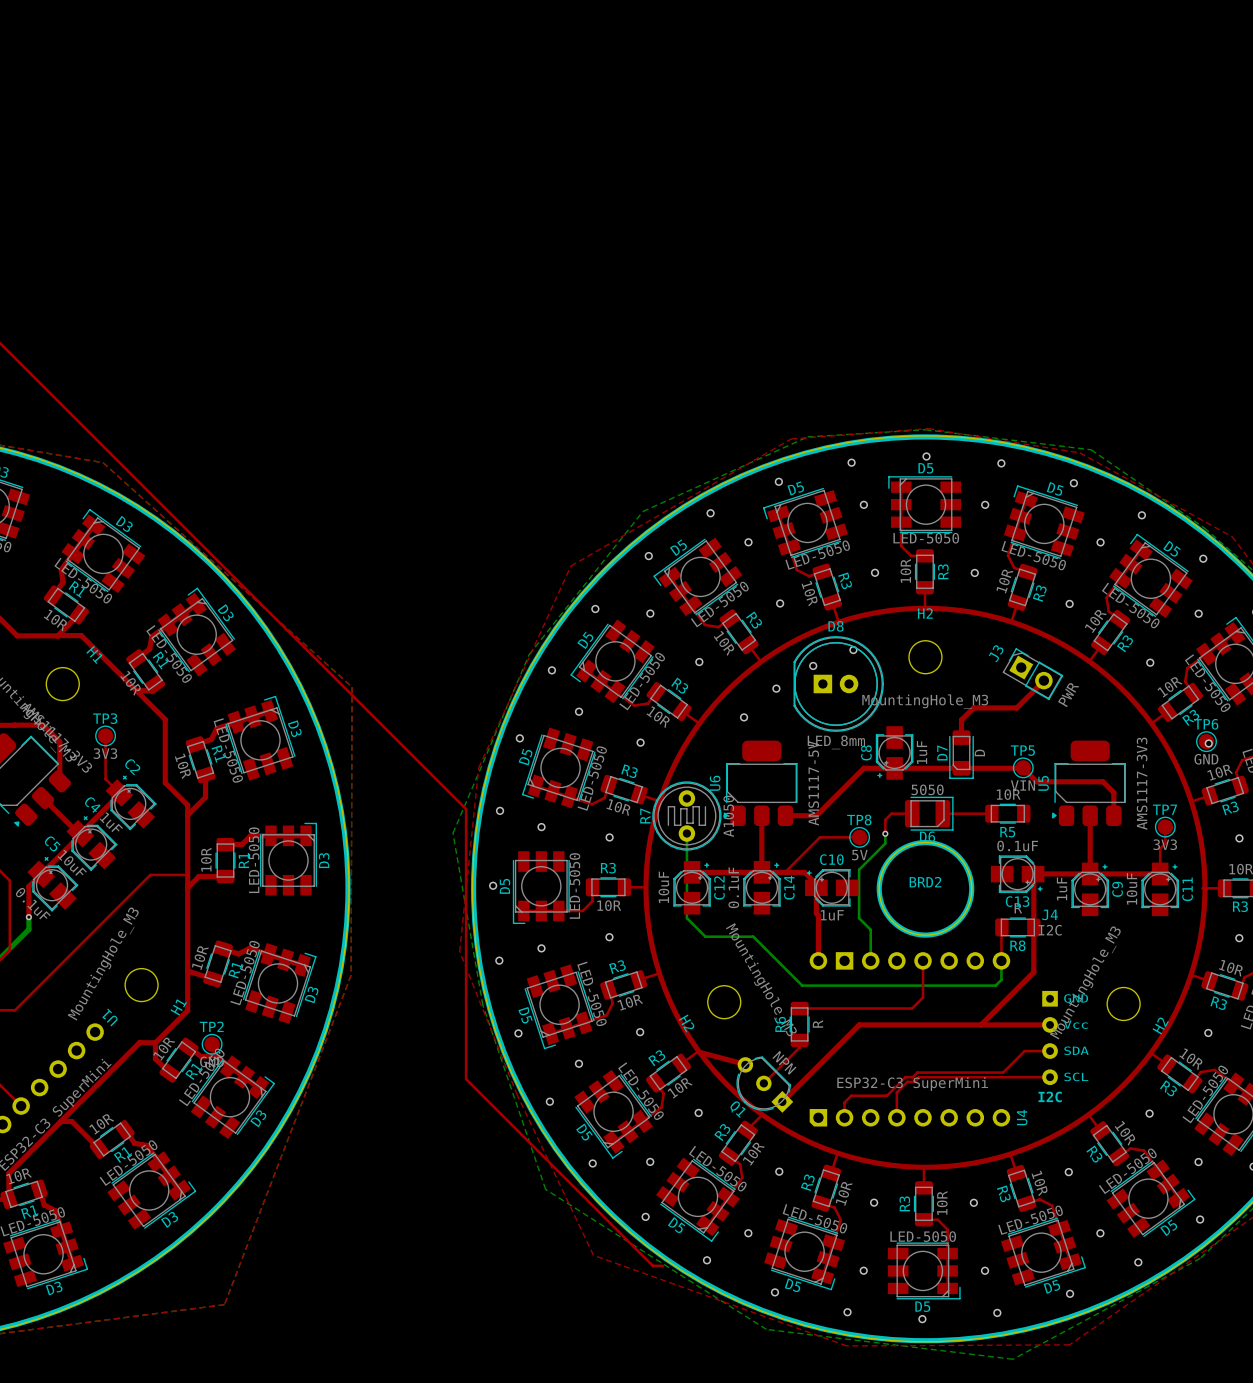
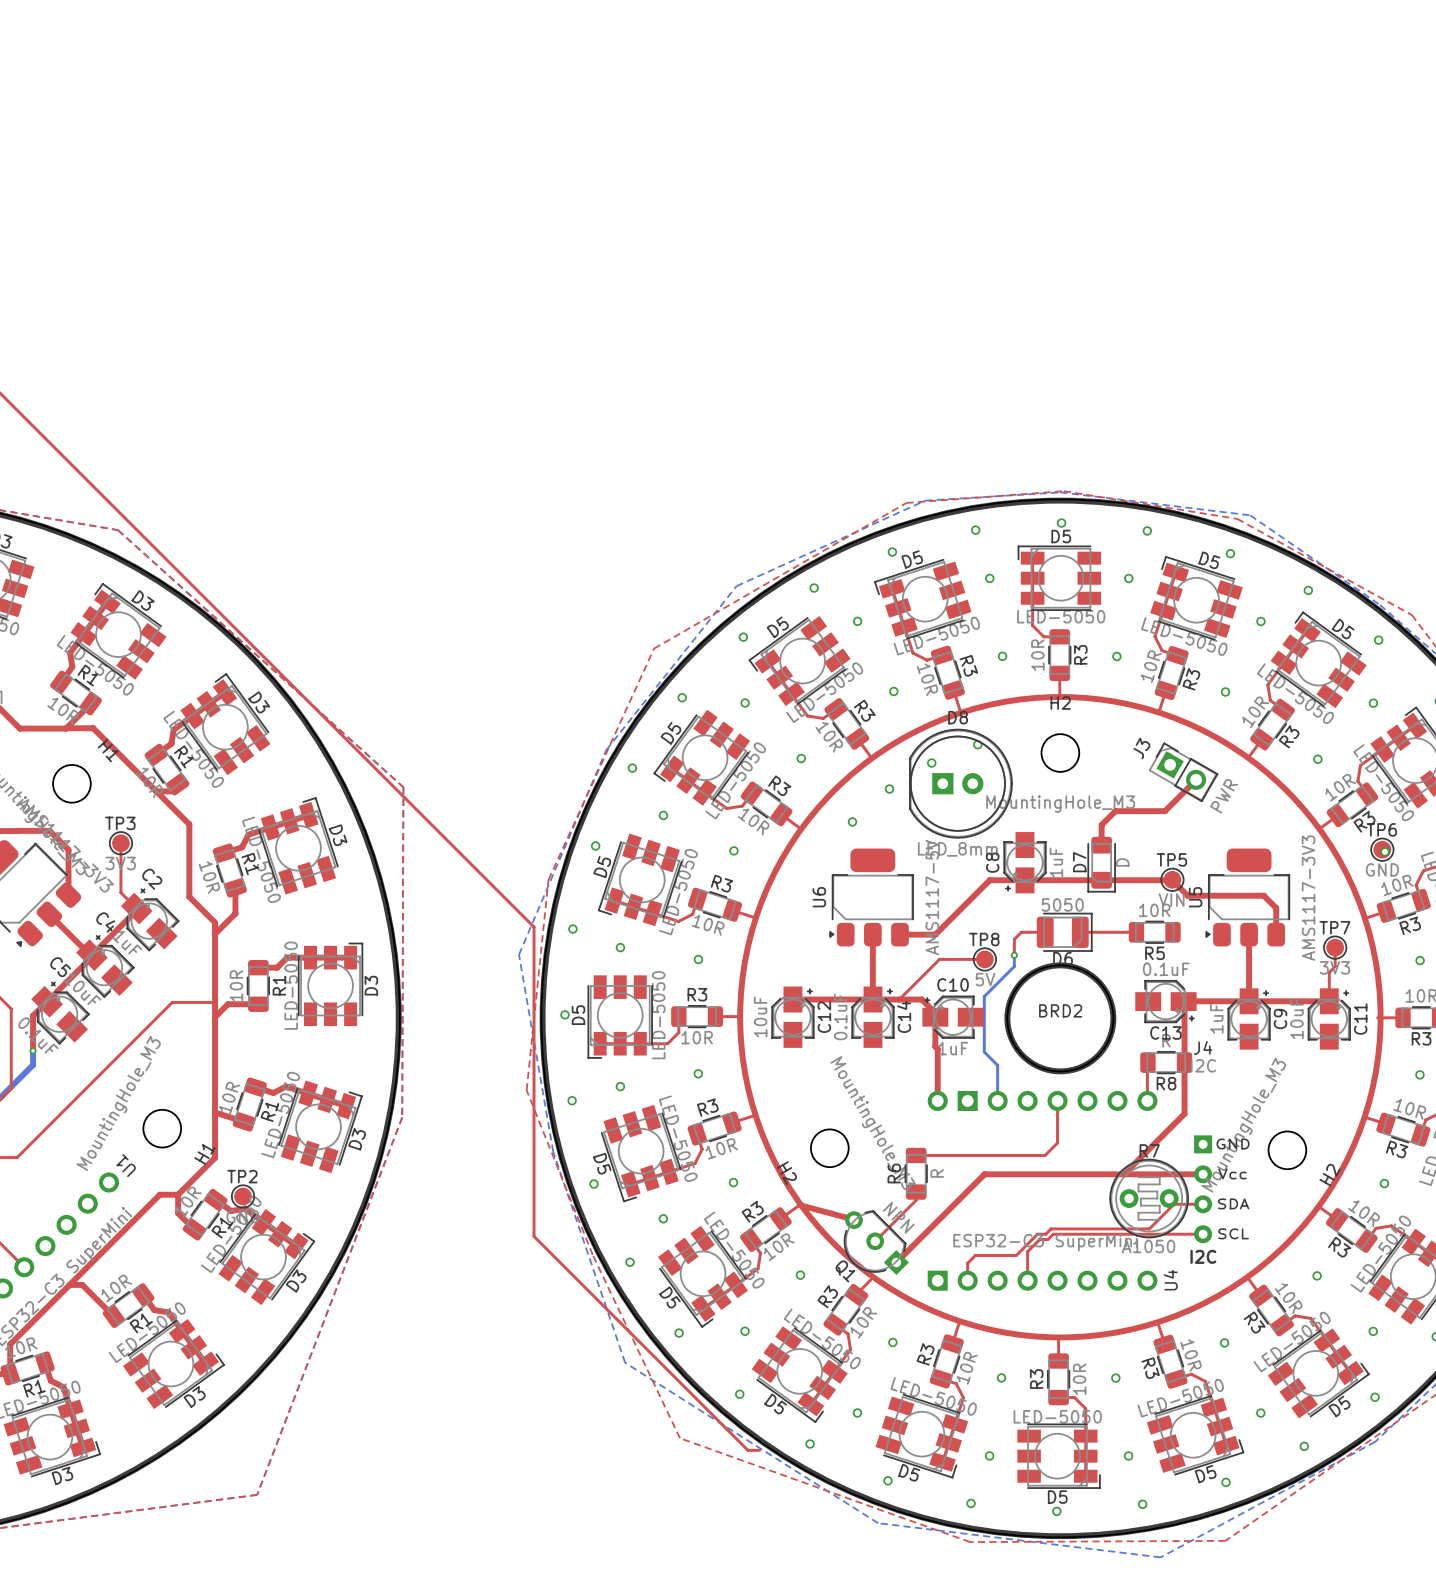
R7 rotation: 0° (686, 816) -> 90° clockwise (1149, 1198)
R7 position: (686, 816) -> (1149, 1198)
bottom track: (686, 833) (686, 918) (705, 936) (753, 936) (802, 985) (995, 985) (1001, 979) (1001, 960) -> none

